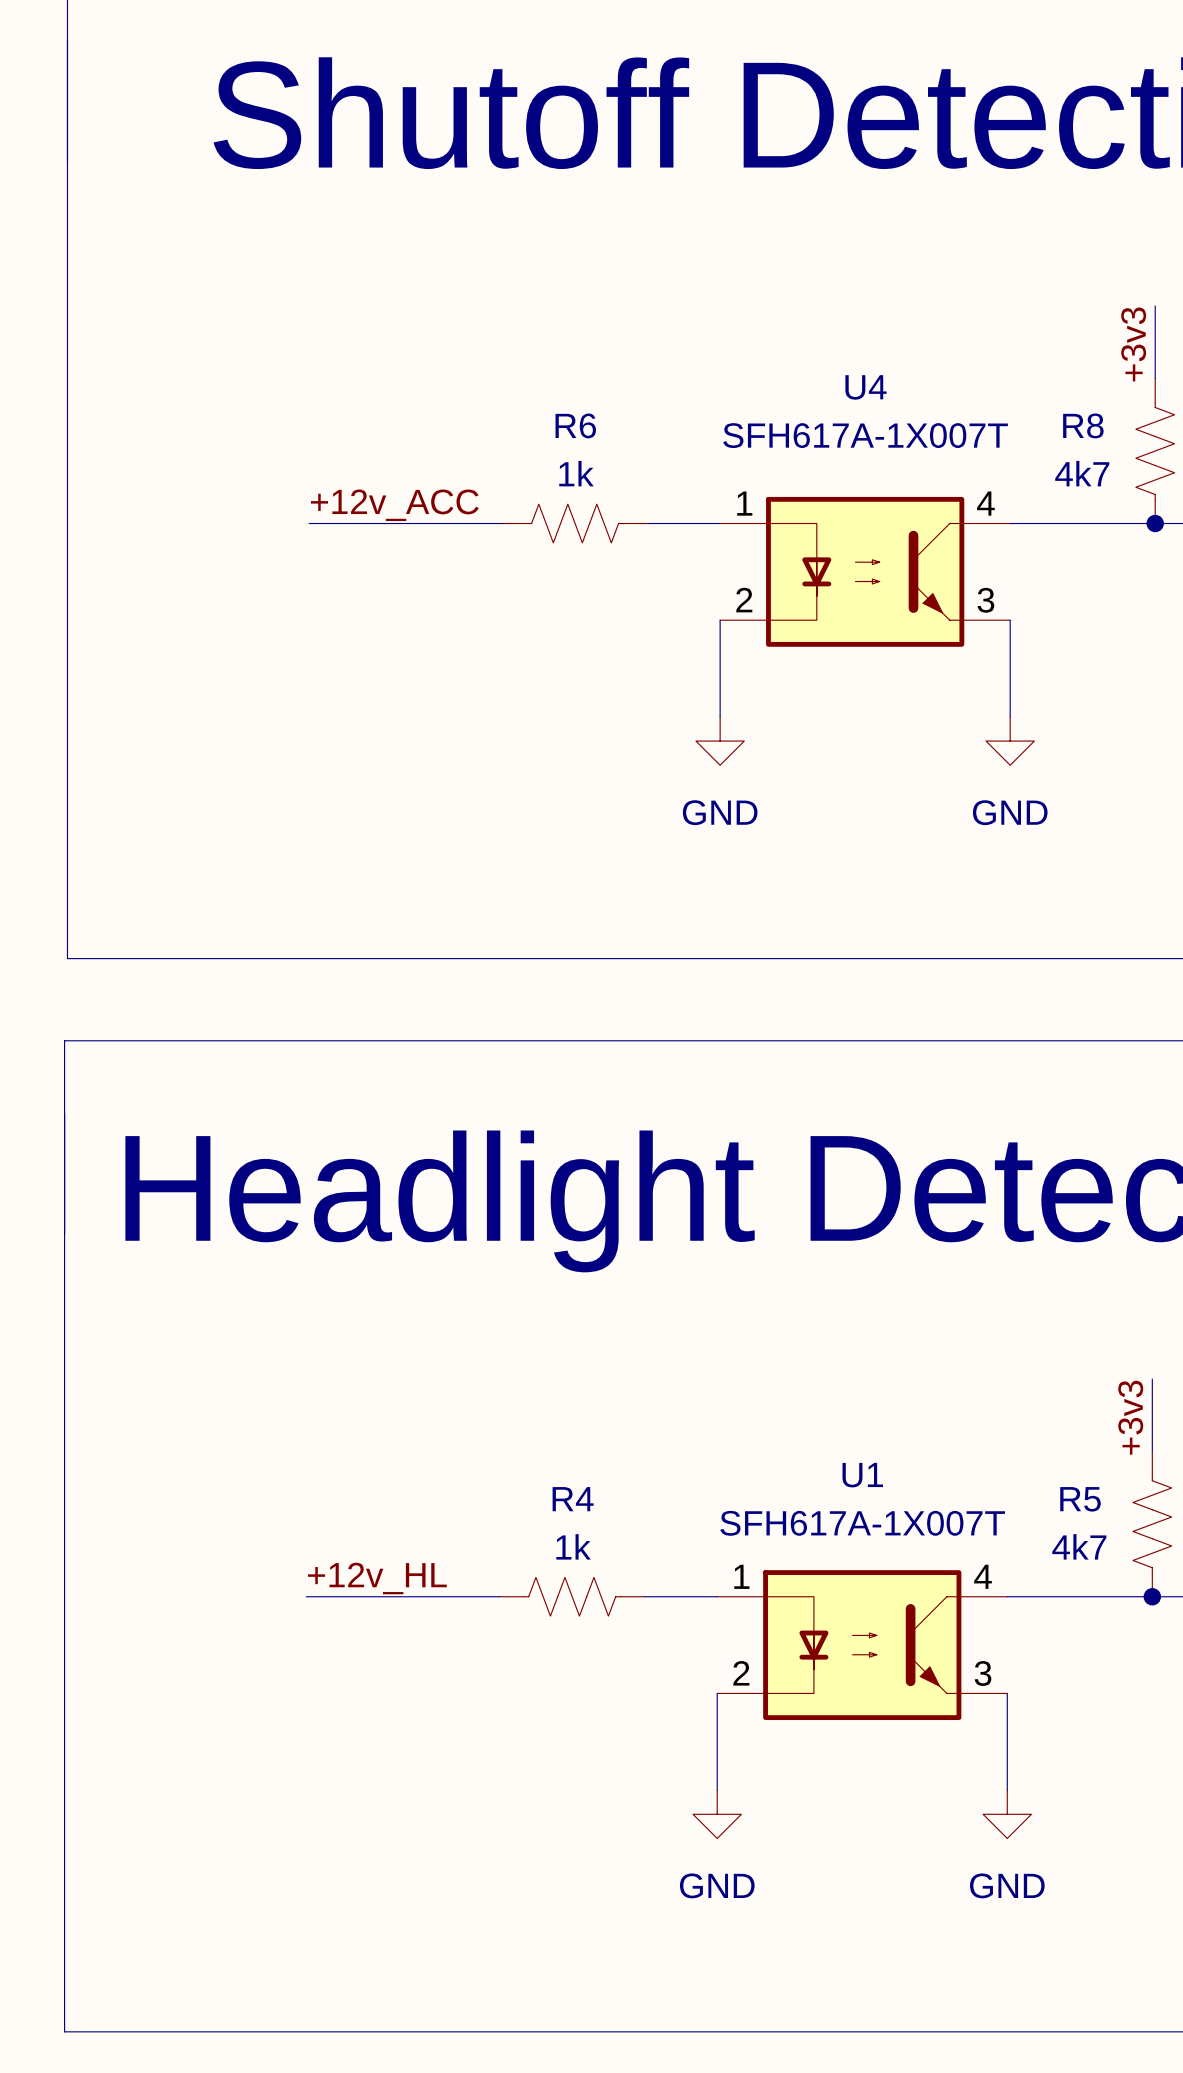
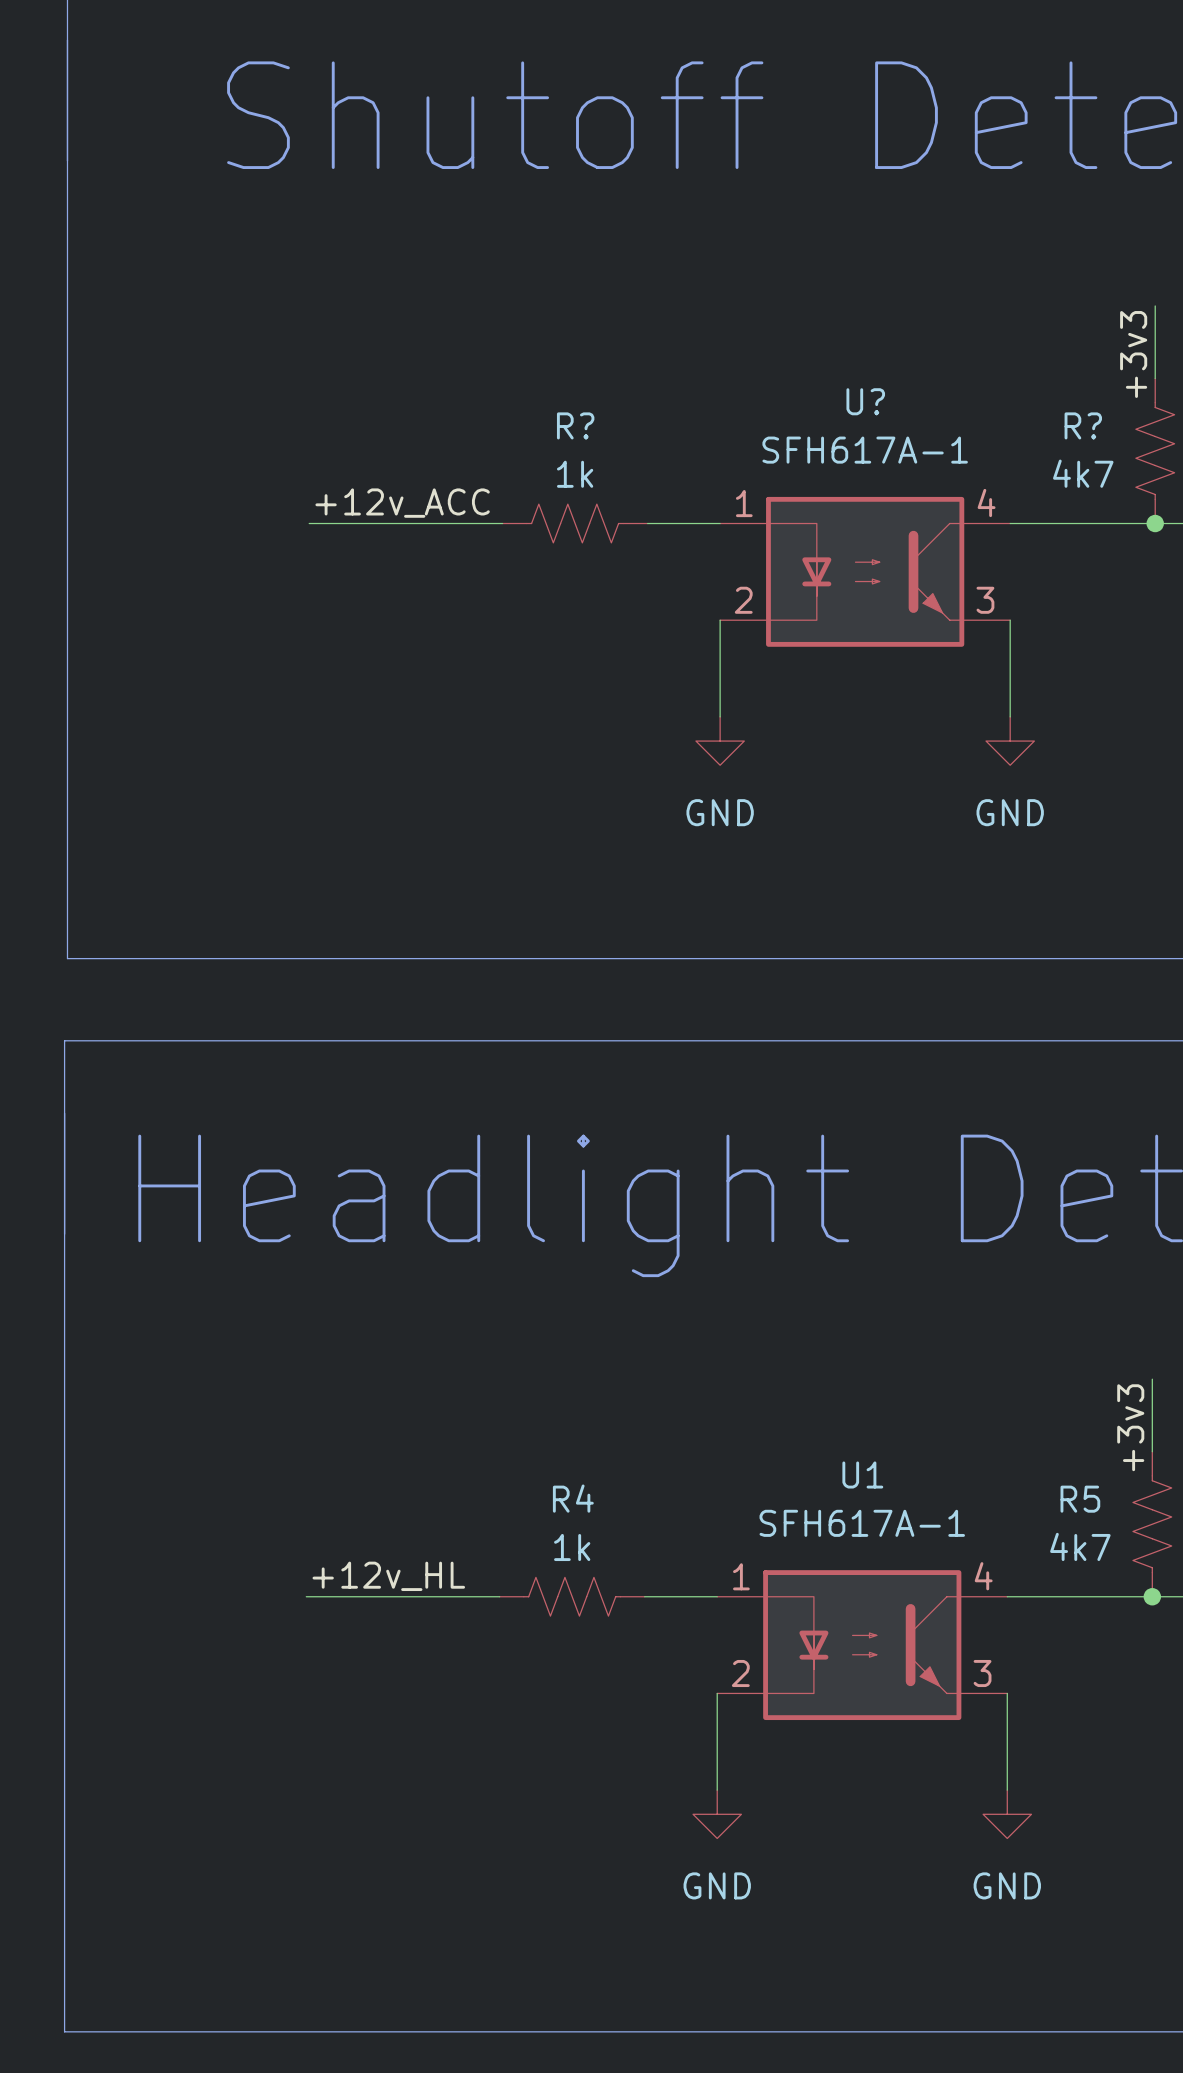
U4 name: U4 (866, 387) -> U? (865, 401)
R6 name: R6 (575, 425) -> R? (575, 425)
R8 name: R8 (1083, 425) -> R? (1083, 425)
U4 value: SFH617A-1X007T (865, 435) -> SFH617A-1 (865, 450)
U1 value: SFH617A-1X007T (862, 1523) -> SFH617A-1 (862, 1523)

